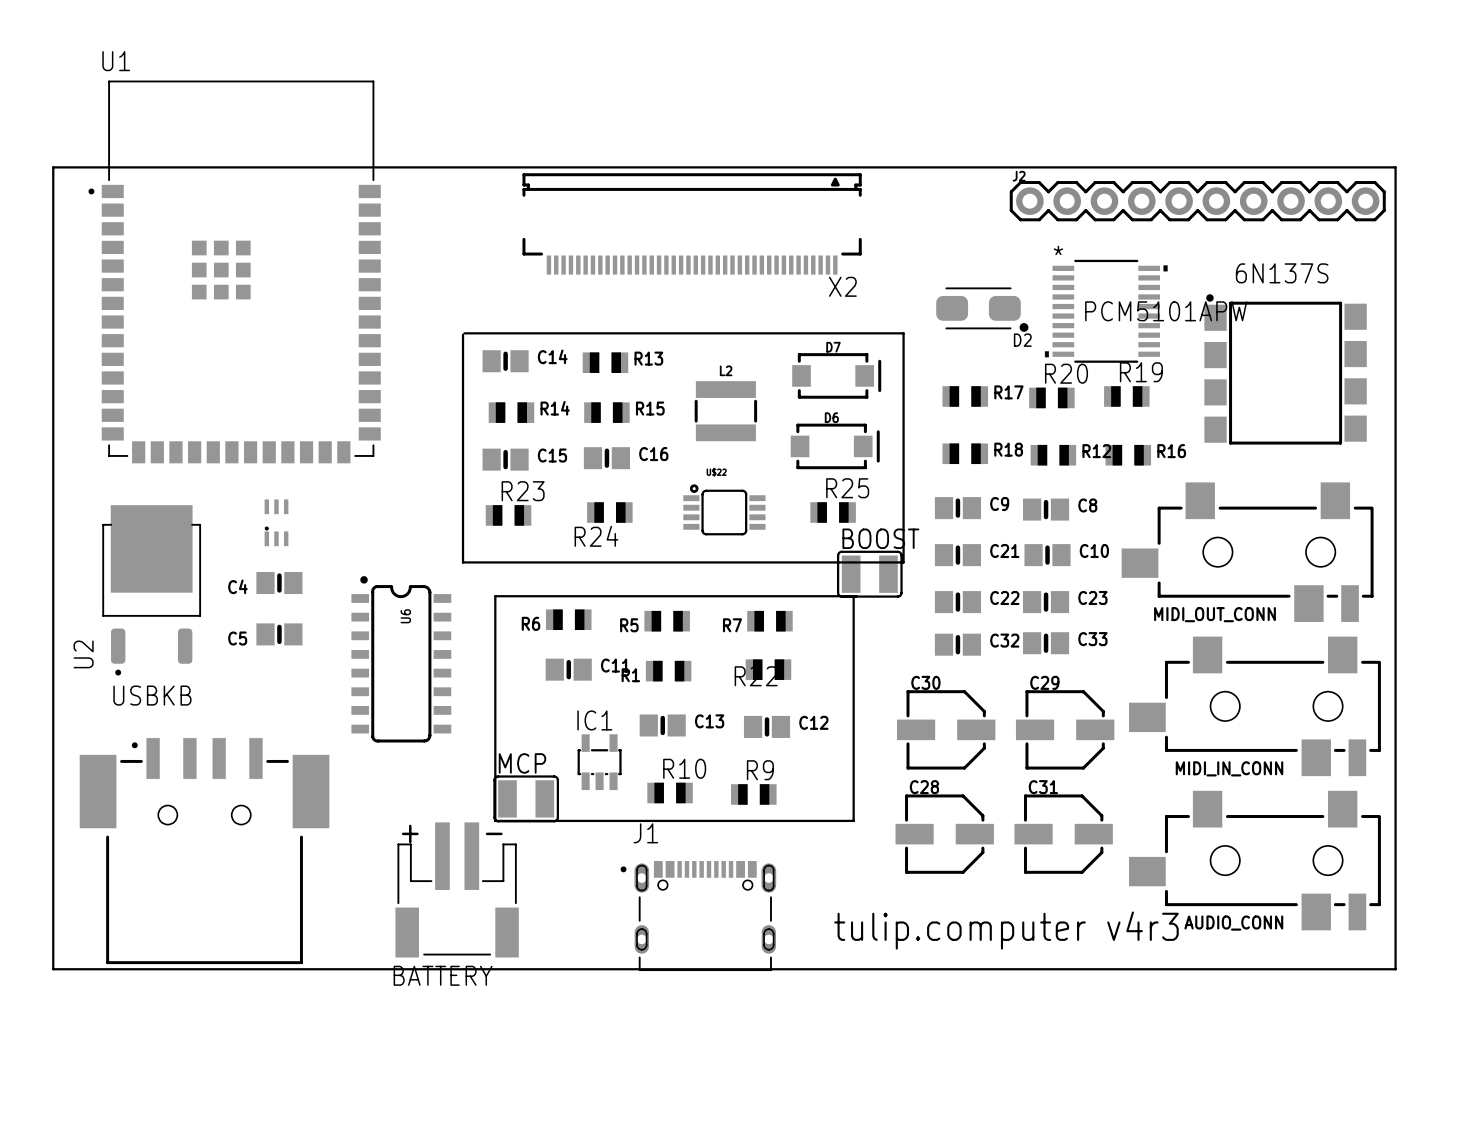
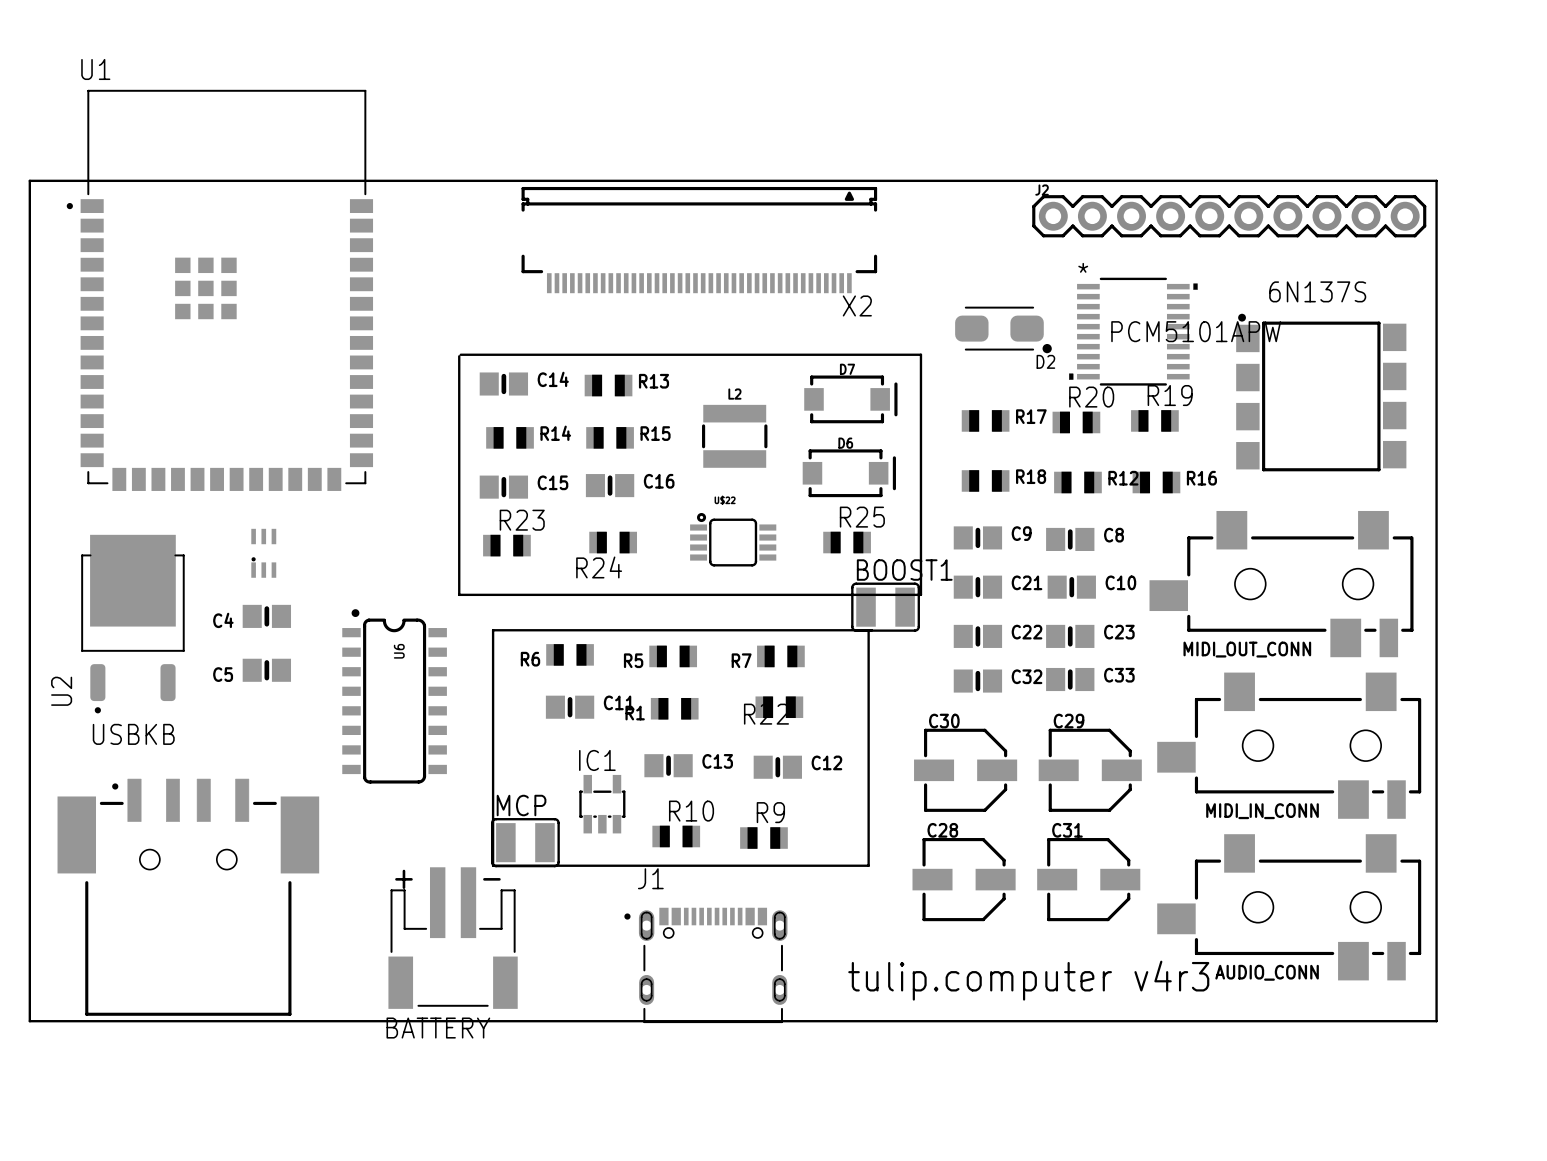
BOOST name: BOOST (880, 538) -> BOOST1 (904, 570)

